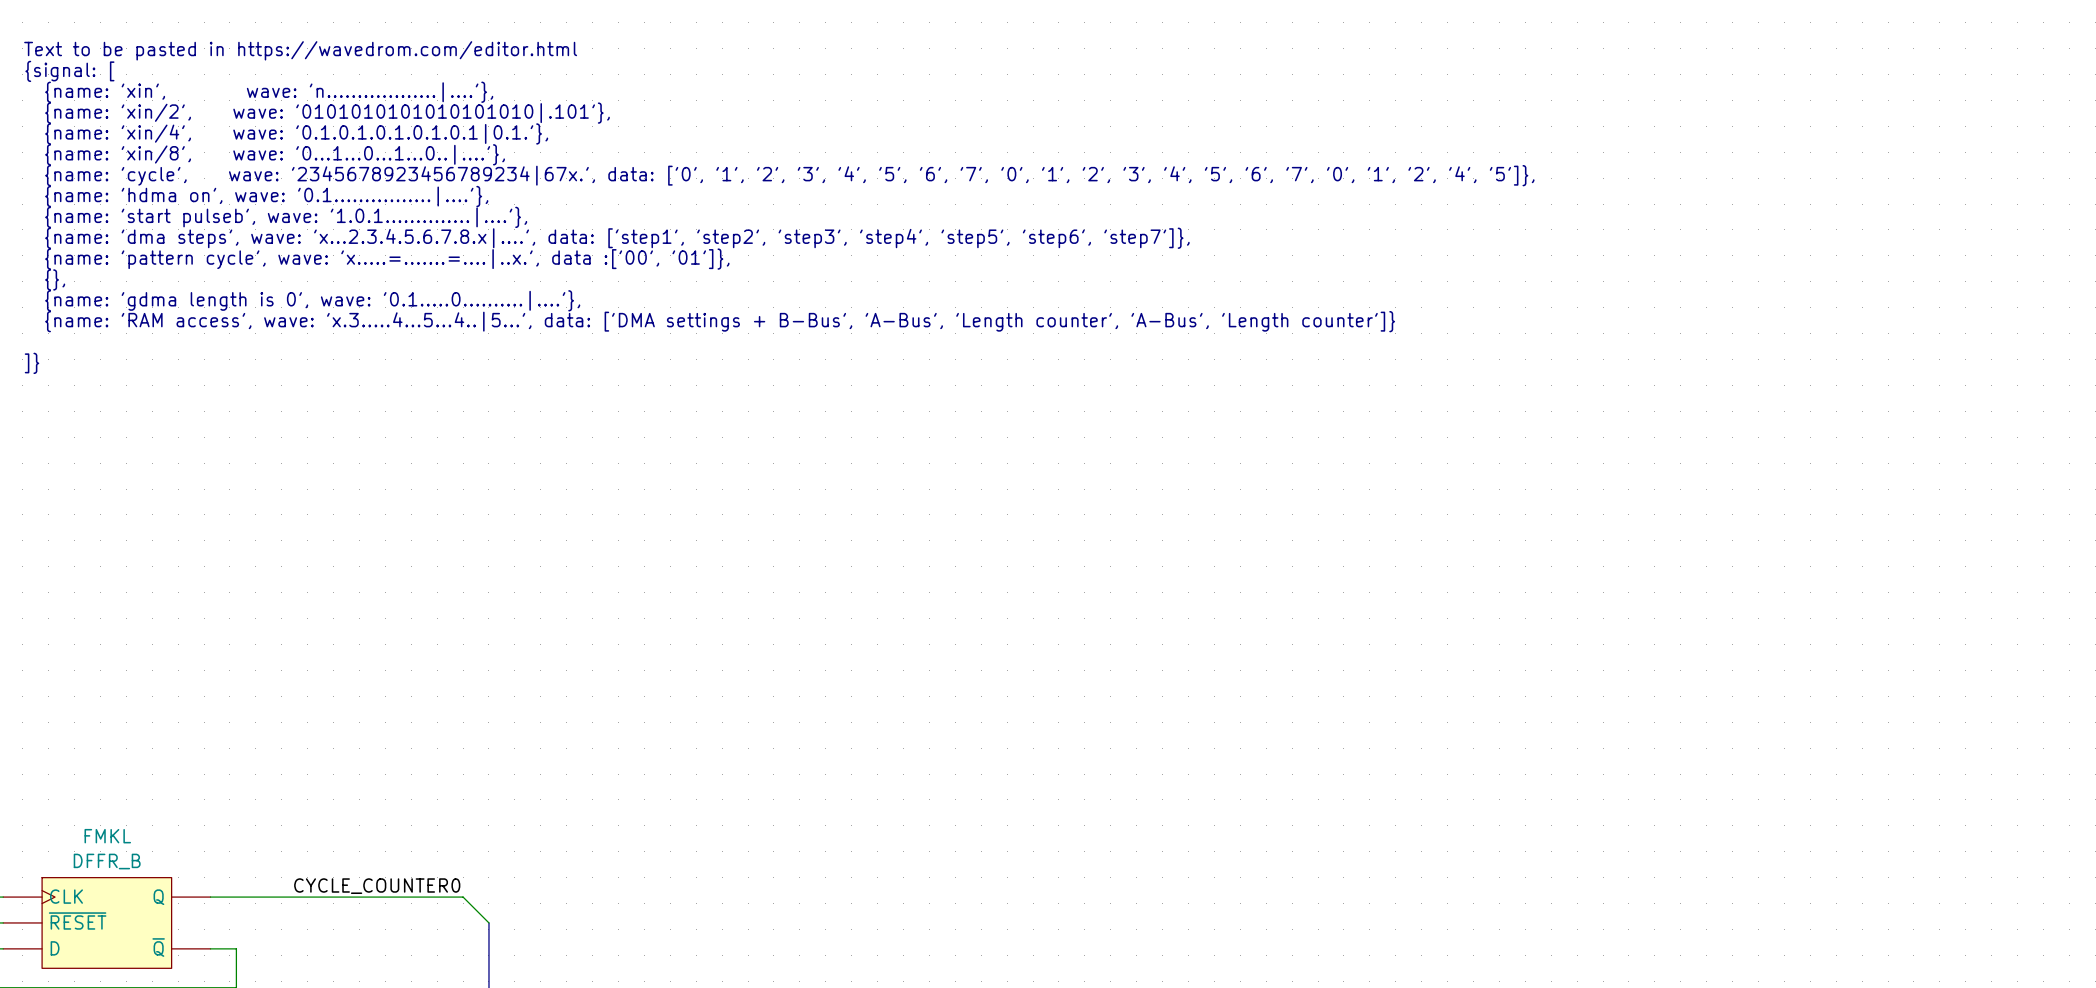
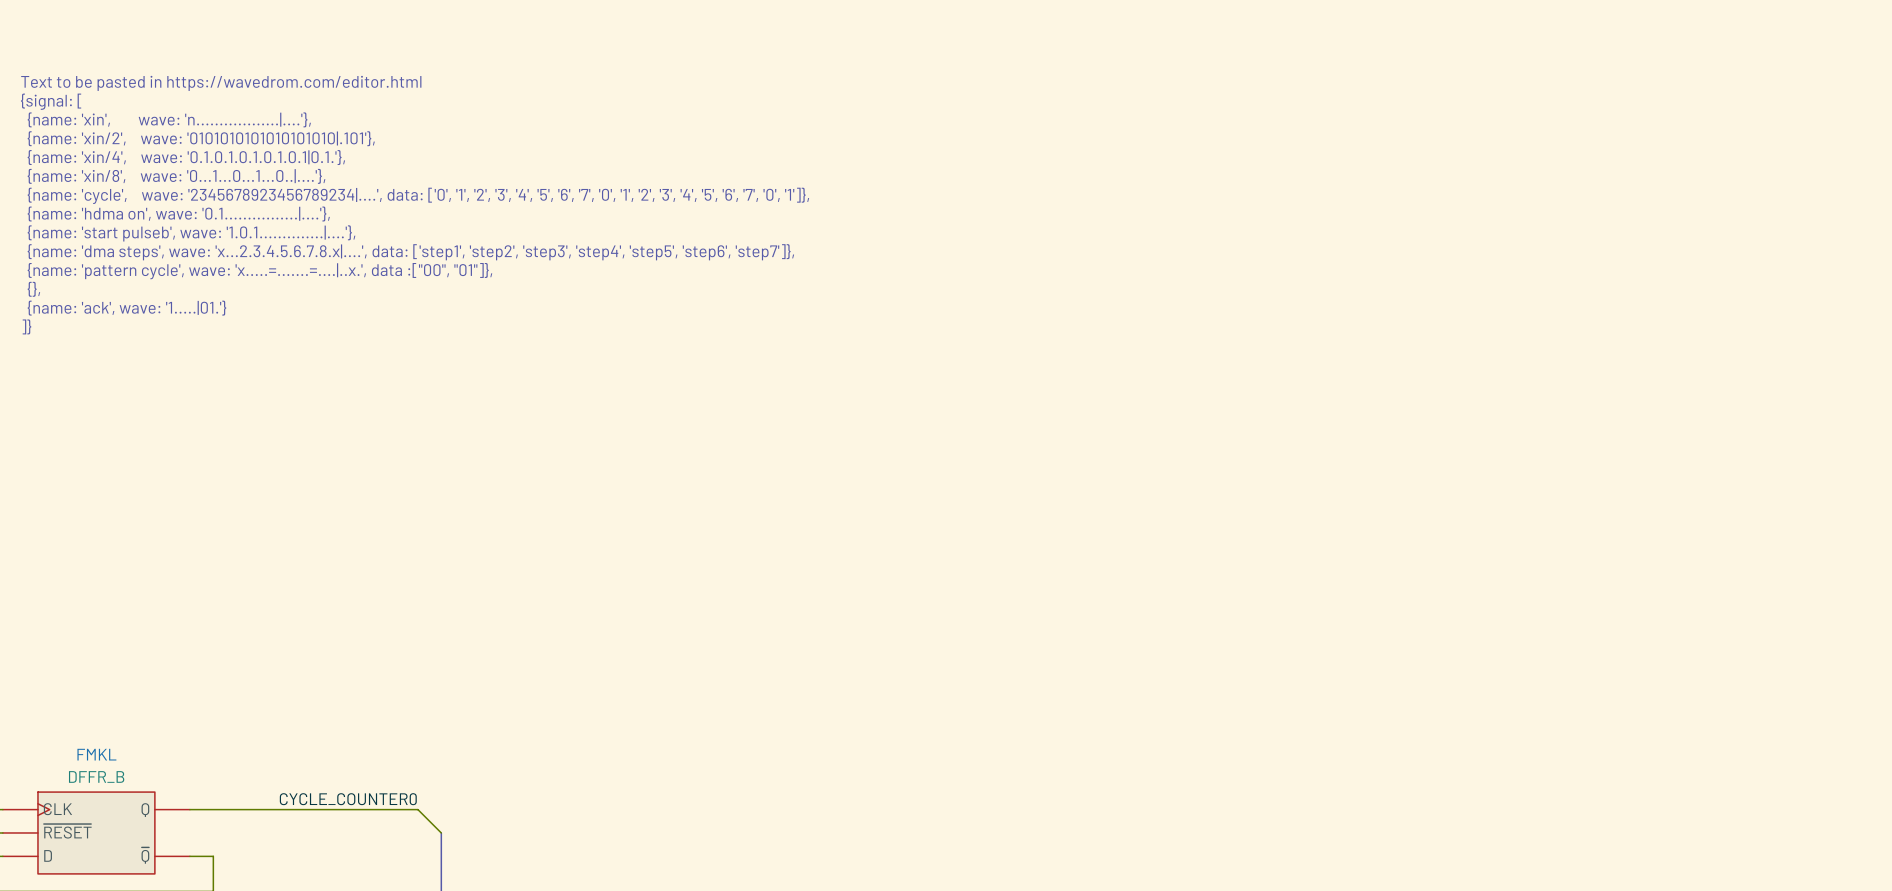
text: Text to be pasted in https://wavedrom.com/editor.html (300, 50) -> none
text: {signal: [ (69, 71) -> none
text: {name: 'xin', wave: 'n..................|....'}, (269, 92) -> Text to be pasted in https://wavedrom.com/editor.html (221, 83)
text: {name: 'xin/2', wave: '0101010101010101010|.101'}, (327, 113) -> {signal: [ (51, 101)
text: {name: 'xin/4', wave: '0.1.0.1.0.1.0.1.0.1|0.1.'}, (296, 133) -> {name: 'xin', wave: 'n..................|....'}, (169, 119)
text: {name: 'xin/8', wave: '0...1...0...1...0..|....'}, (275, 154) -> {name: 'xin/2', wave: '0101010101010101010|.101'}, (201, 138)
text: {name: 'cycle', wave: '2345678923456789234|67x.', data: ['0', '1', '2', '3', '4', '5', '6', '7', '0', '1', '2', '3', '4', '5', '6', '7', '0', '1', '2', '4', '5']}, (789, 175) -> {name: 'xin/4', wave: '0.1.0.1.0.1.0.1.0.1|0.1.'}, (186, 157)
text: {name: 'hdma on', wave: '0.1................|....'}, (266, 196) -> {name: 'xin/8', wave: '0...1...0...1...0..|....'}, (176, 176)
text: {name: 'start pulseb', wave: '1.0.1..............|....'}, (286, 217) -> {name: 'cycle', wave: '2345678923456789234|....', data: ['0', '1', '2', '3', '4', '5', '6', '7', '0', '1', '2', '3', '4', '5', '6', '7', '0', '1']}, (418, 195)
text: {name: 'dma steps', wave: 'x...2.3.4.5.6.7.8.x|....', data: ['step1', 'step2', 'step3', 'step4', 'step5', 'step6', 'step7']}, (617, 238) -> {name: 'hdma on', wave: '0.1................|....'}, (178, 214)
text: {name: 'pattern cycle', wave: 'x.....=.......=....|..x.', data :['00', '01']}, (387, 259) -> {name: 'start pulseb', wave: '1.0.1..............|....'}, (191, 233)
text: {}, (55, 279) -> {name: 'dma steps', wave: 'x...2.3.4.5.6.7.8.x|....', data: ['step1', 'step2', 'step3', 'step4', 'step5', 'step6', 'step7']}, (410, 252)
text: {name: 'gdma length is 0', wave: '0.1.....0..........|....'}, (312, 300) -> {name: 'pattern cycle', wave: 'x.....=.......=....|..x.', data :["00", "01"]}, (259, 271)
text: {name: 'RAM access', wave: 'x.3.....4...5...4..|5...', data: ['DMA settings + B-Bus', 'A-Bus', 'Length counter', 'A-Bus', 'Length counter']} (720, 321) -> {}, (33, 289)
text: none -> {name: 'ack', wave: '1.....|01.'} (126, 308)

